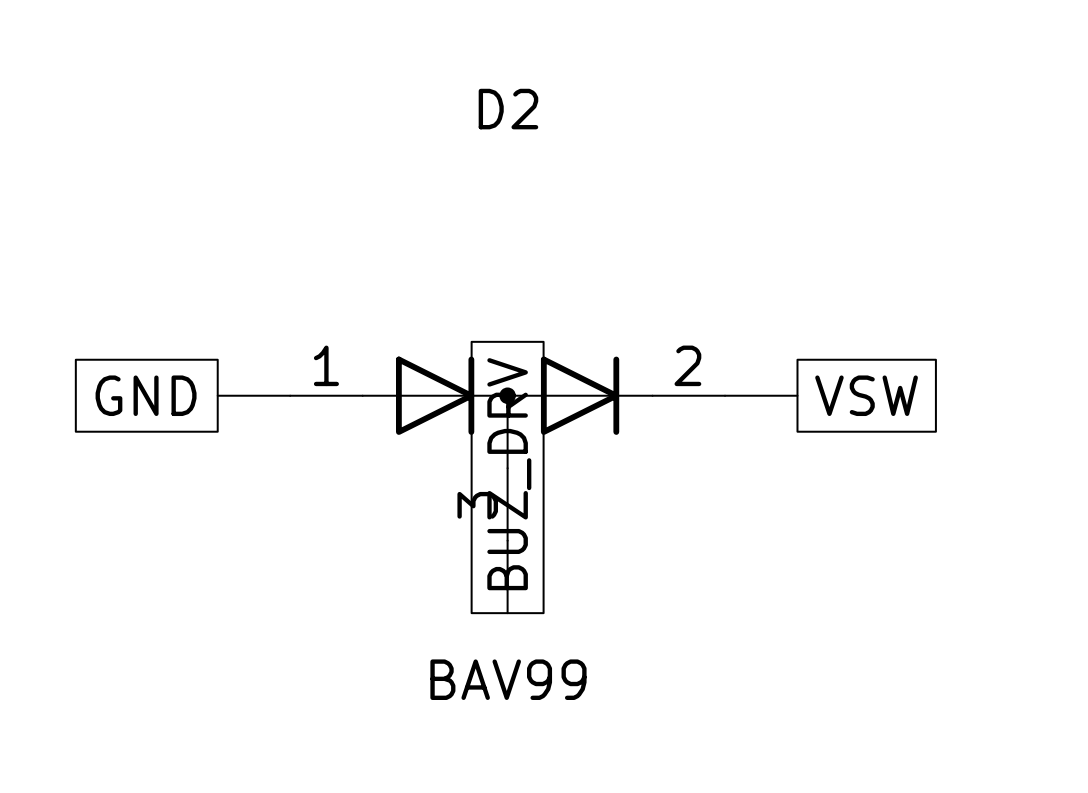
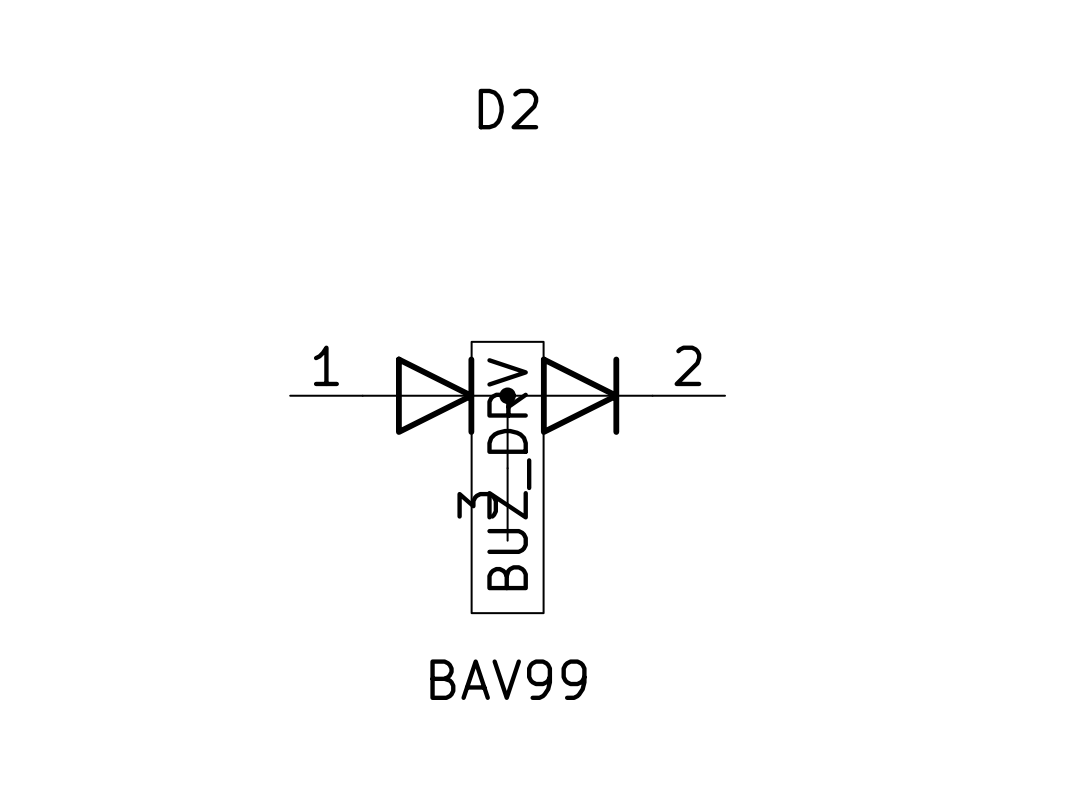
global label: GND (146, 395) -> none
wire: (217, 395) (290, 395) -> none
wire: (725, 395) (797, 395) -> none
global label: VSW (866, 395) -> none
wire: (507, 540) (507, 613) -> none

